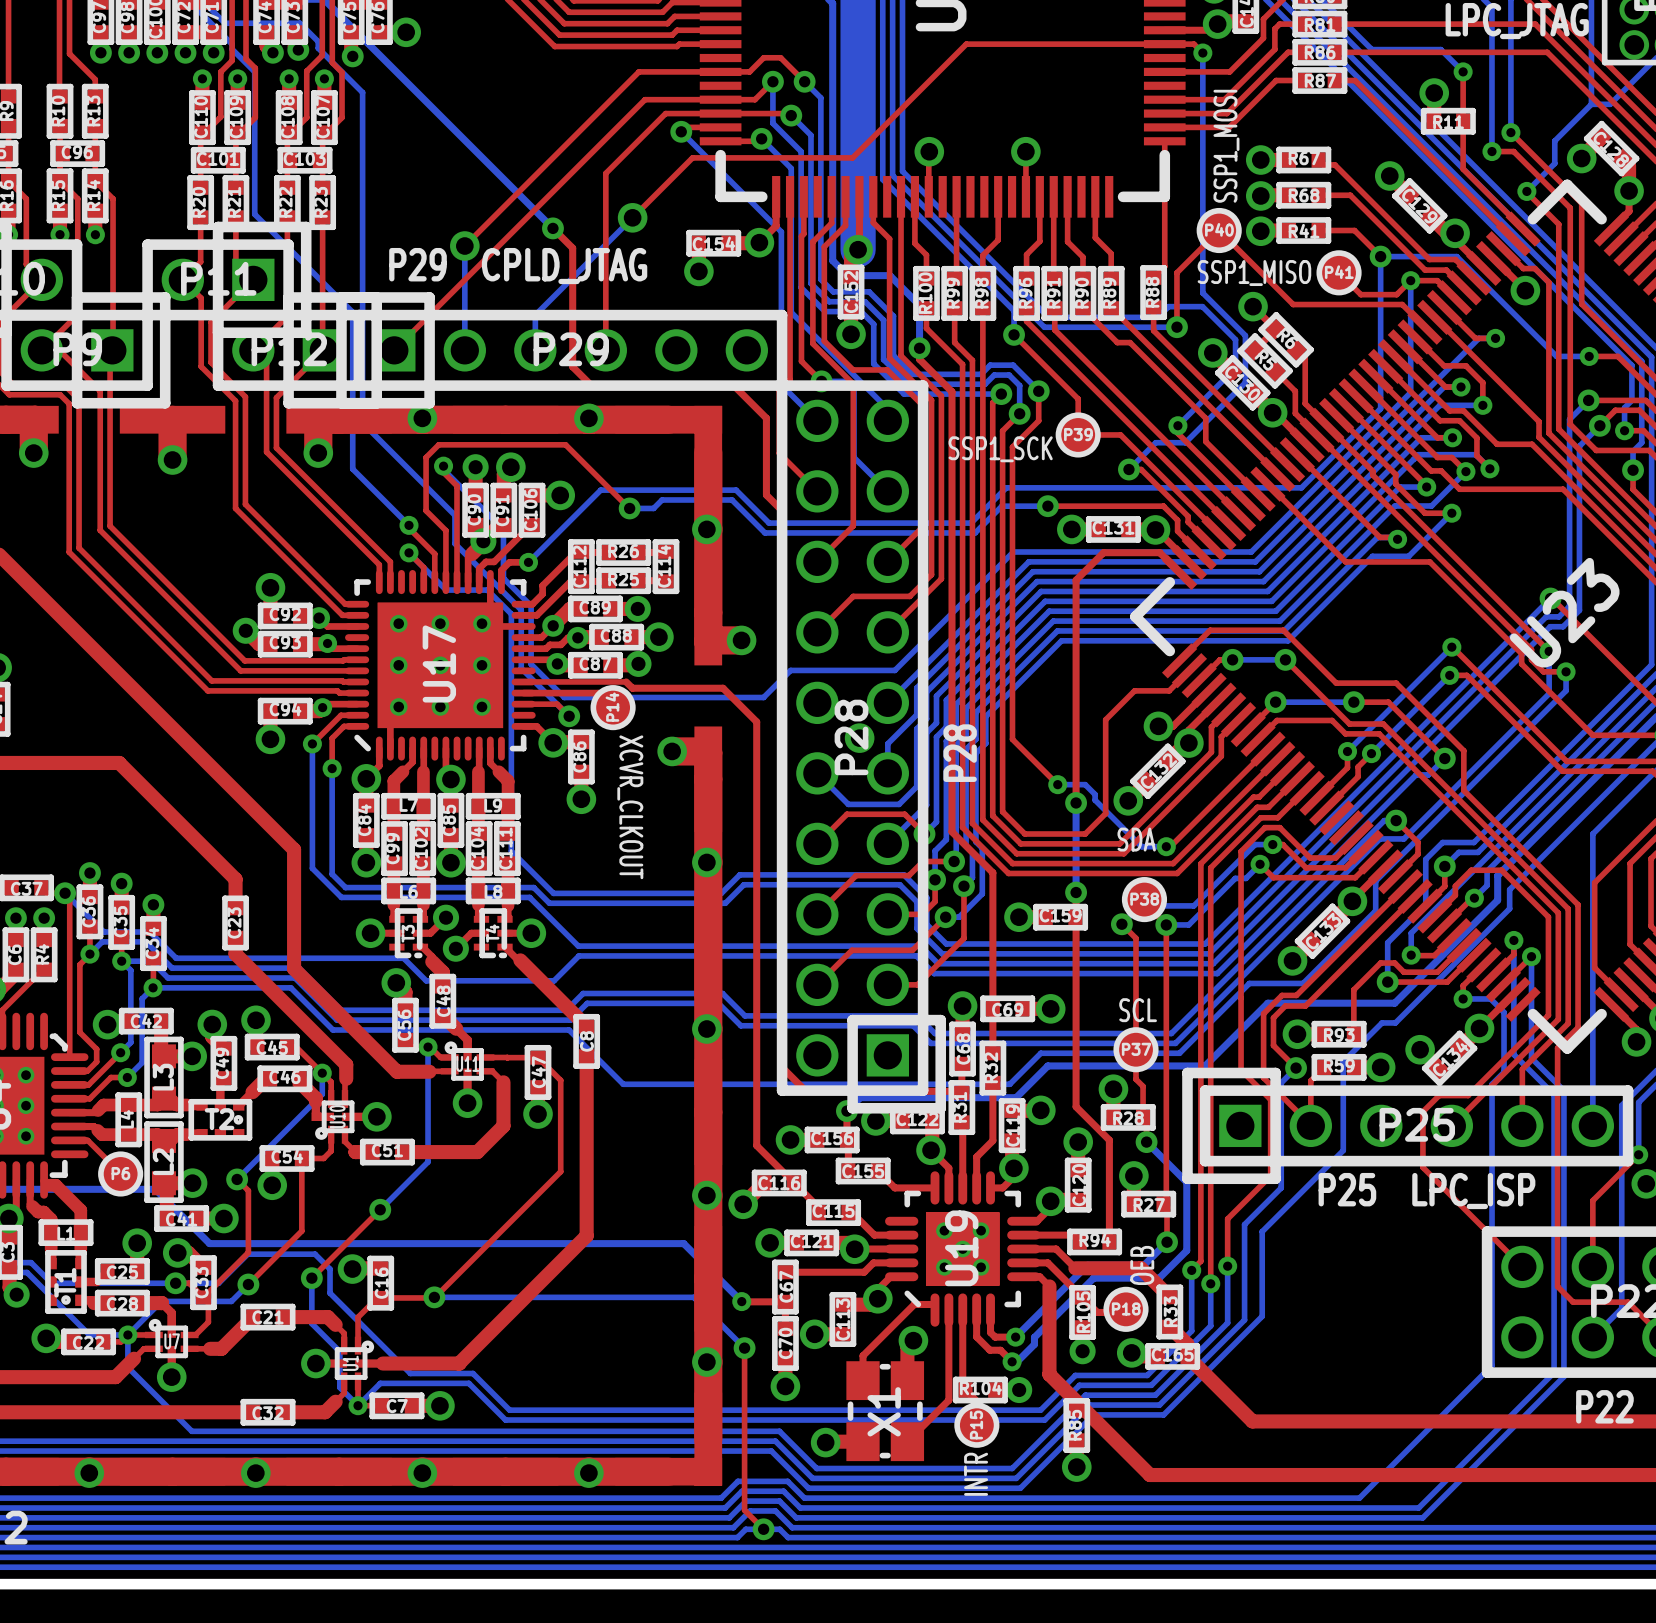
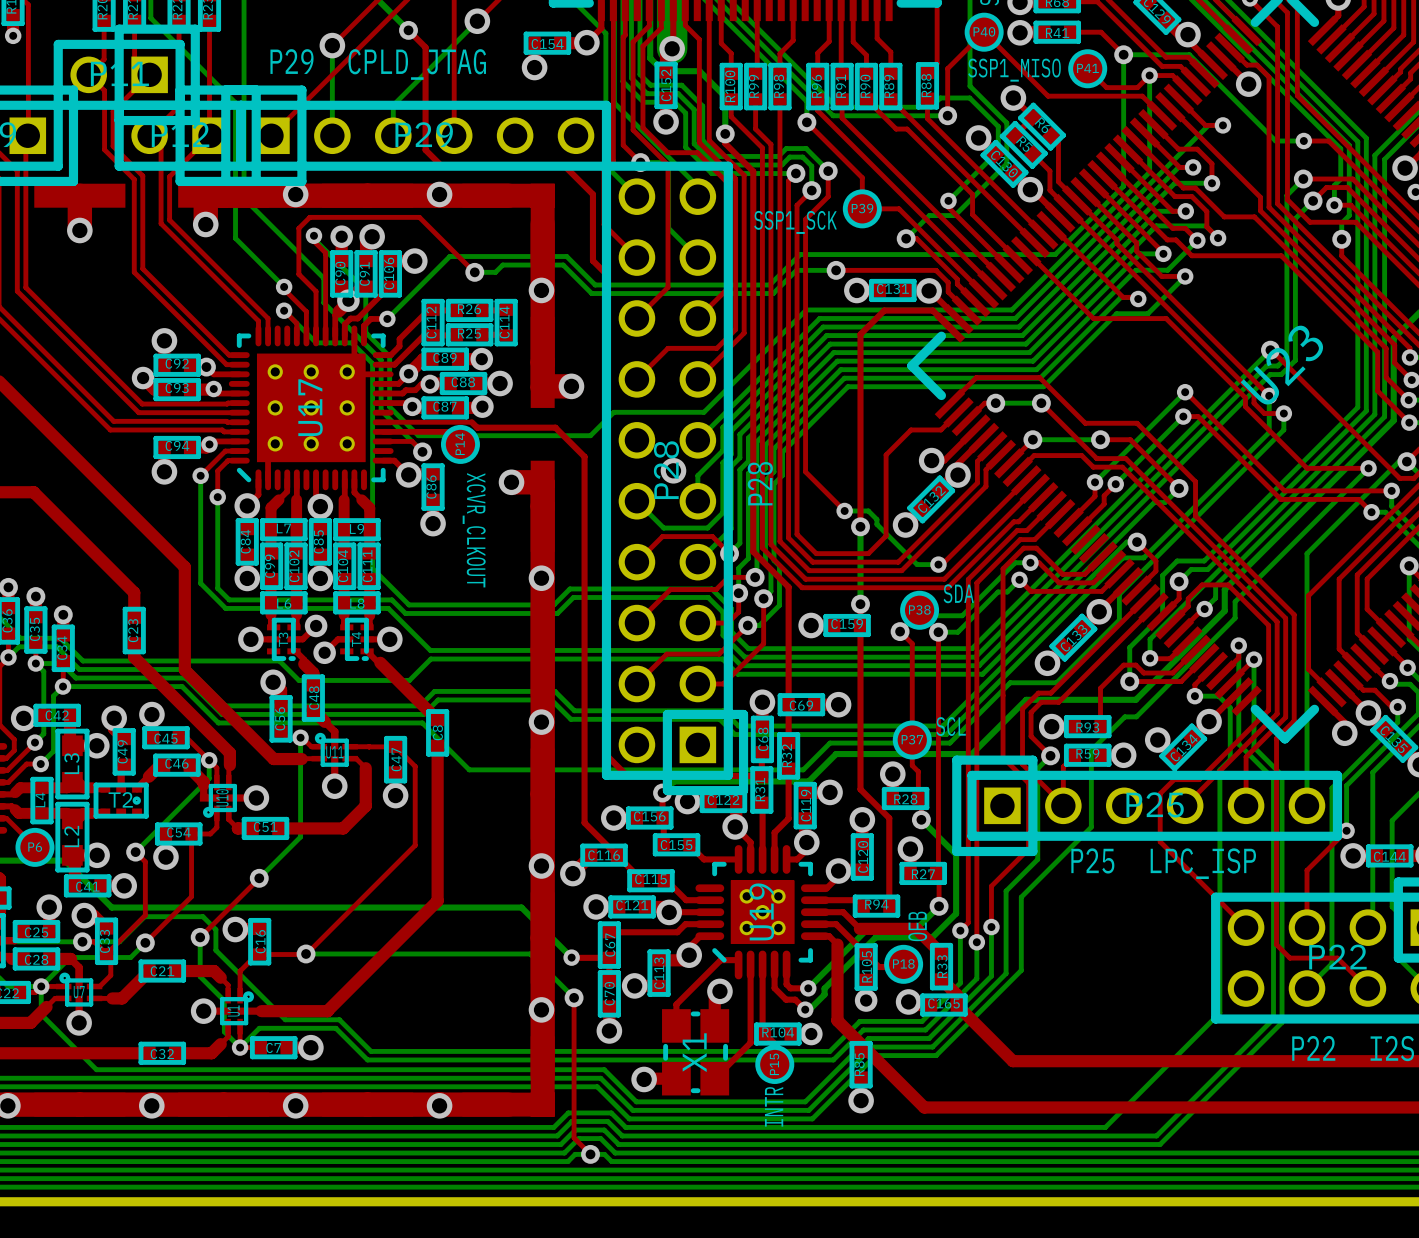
text position: SDA (1136, 839) -> SDA (958, 593)
text position: SCL (1138, 1010) -> SCL (951, 726)

